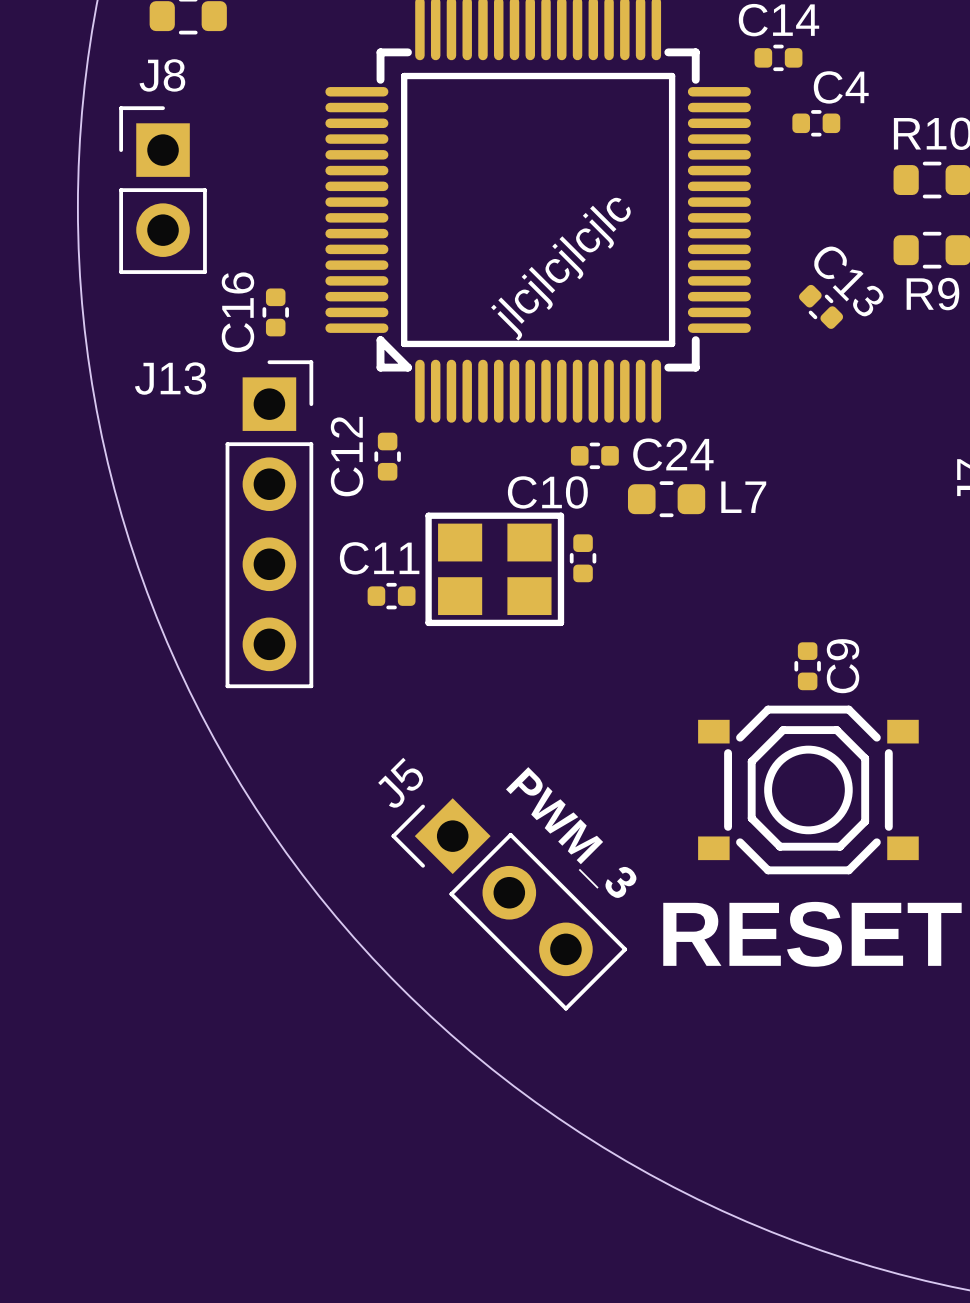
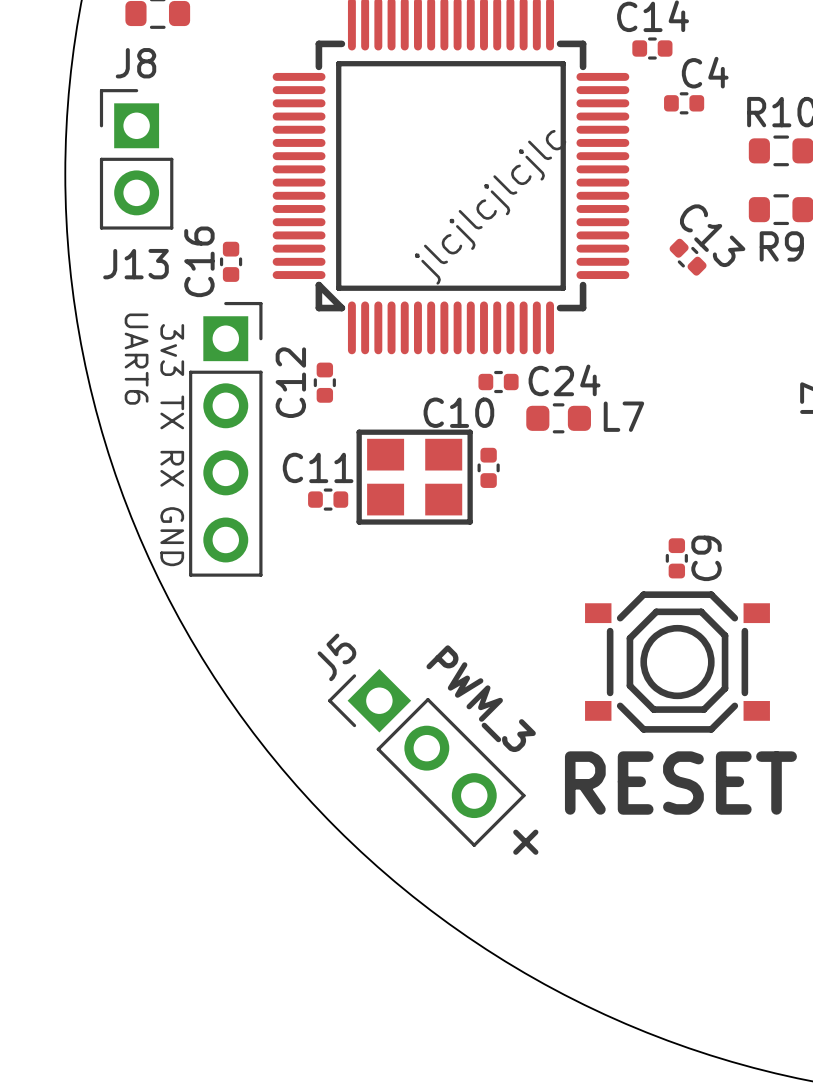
J13 name position: J13 (170, 378) -> J13 (135, 264)
text: none -> UART6 (136, 359)
text: none -> 3v3 TX RX GND (172, 445)
text: none -> + (525, 842)

